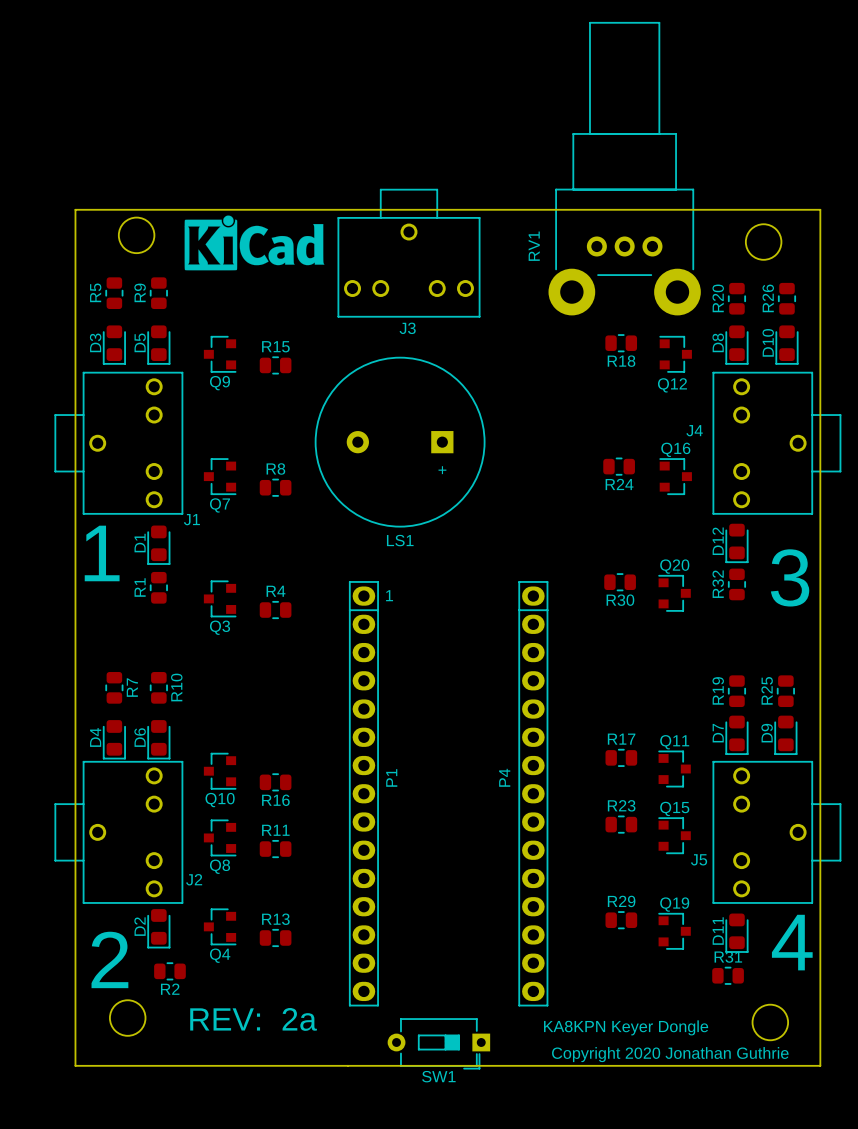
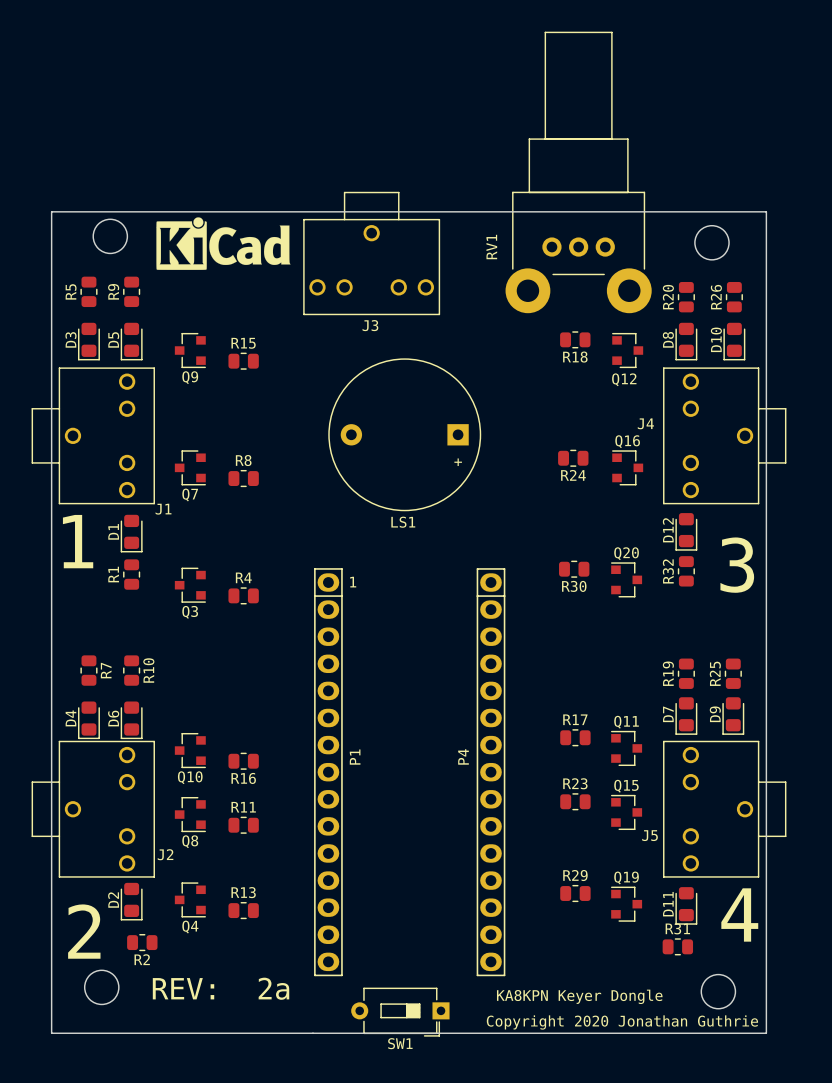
LS1 footprint: [314, 356, 486, 528] -> [328, 358, 482, 512]

